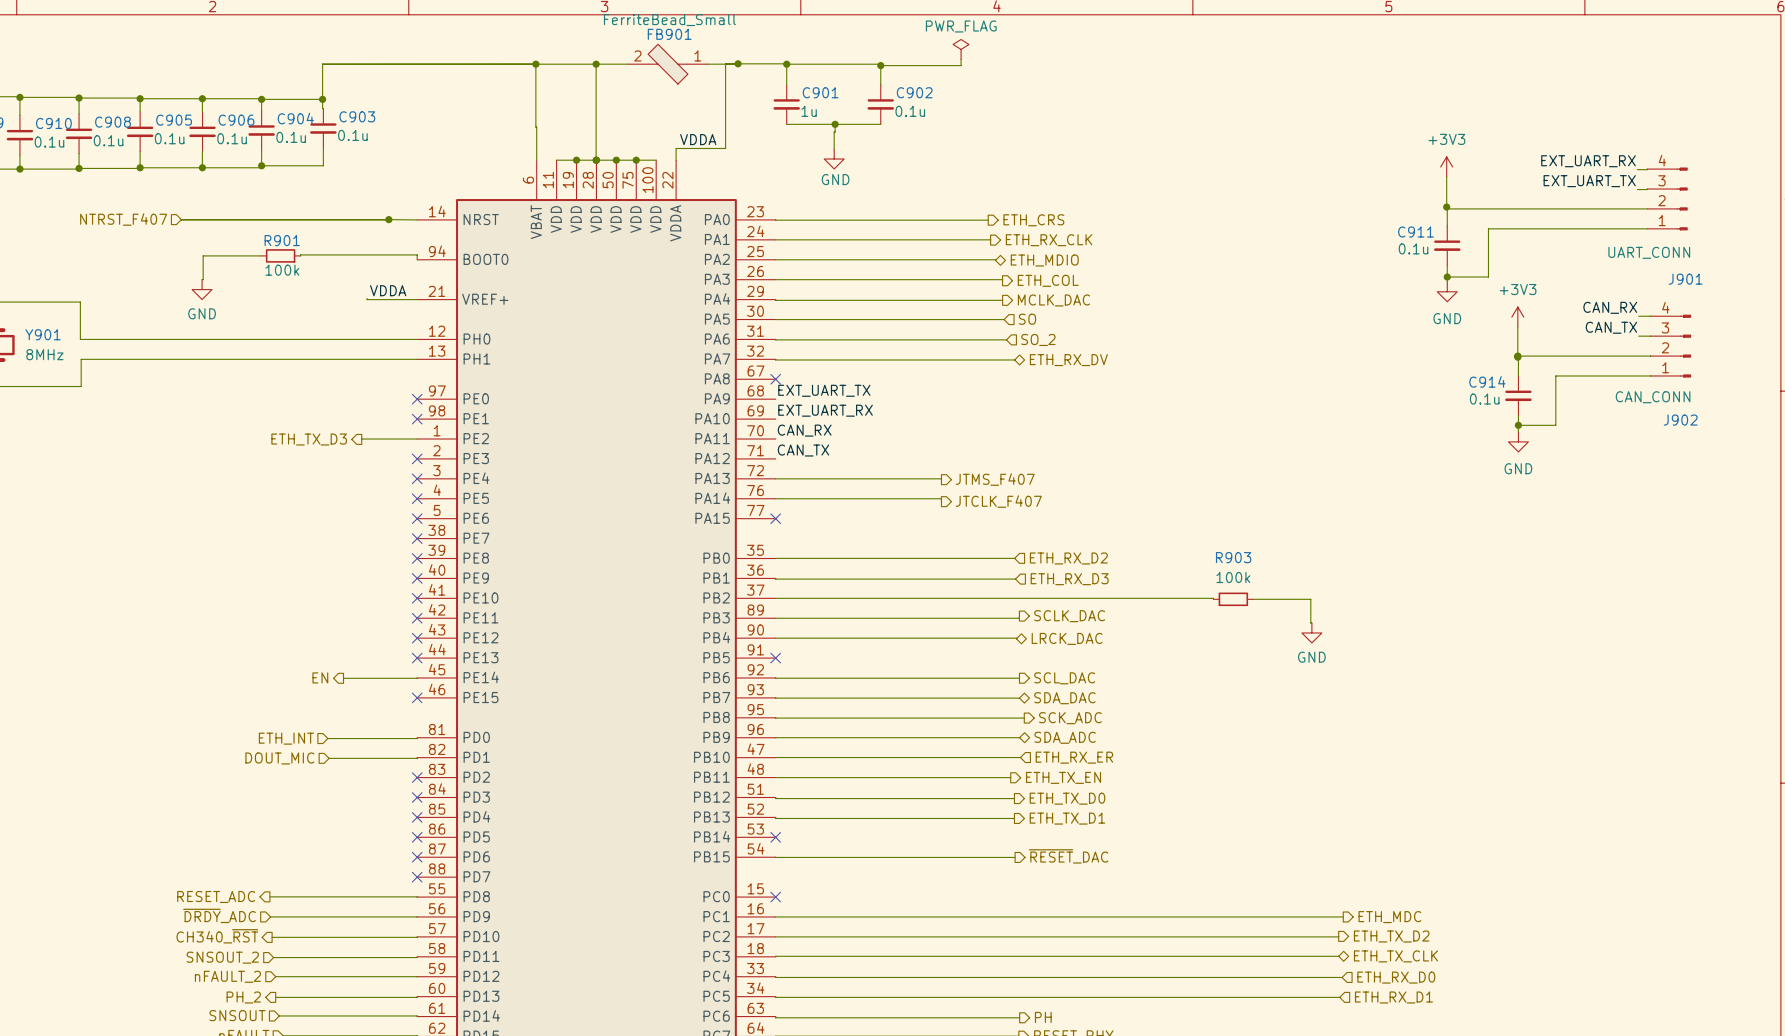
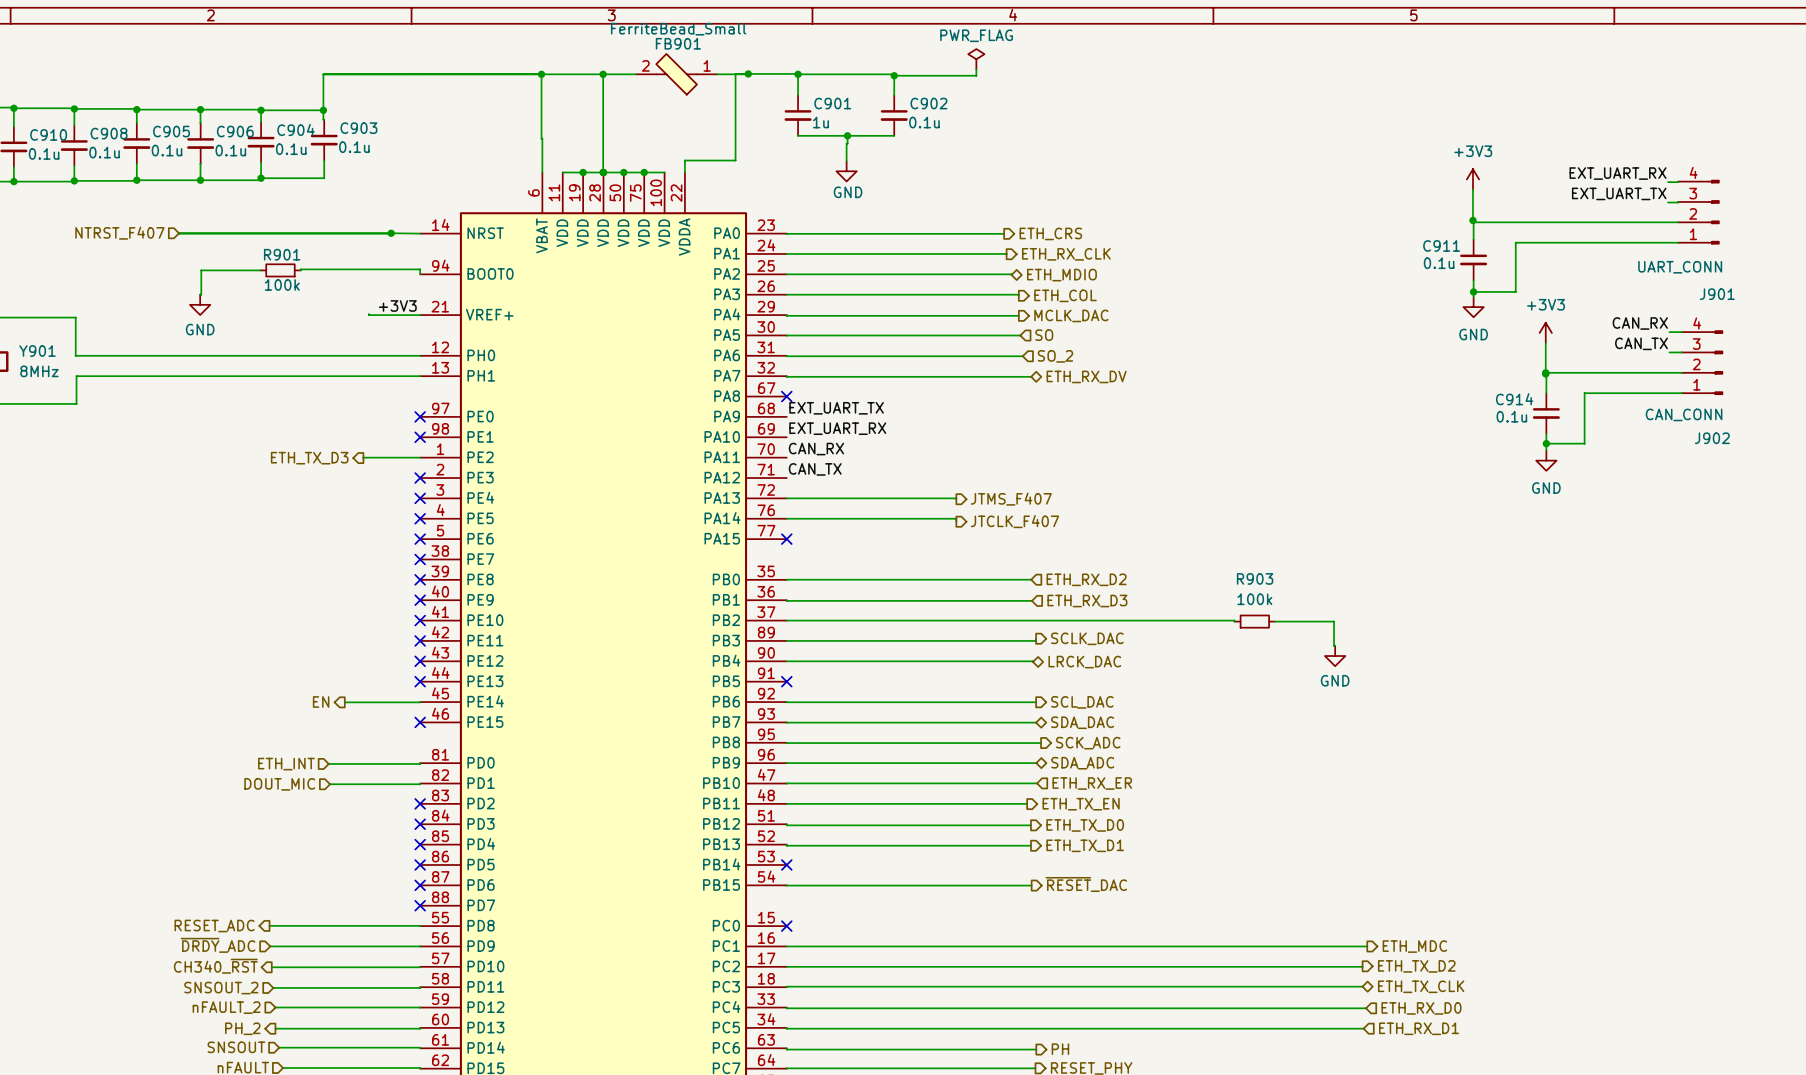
label: VDDA (698, 139) -> none
label: VDDA (388, 290) -> +3V3 (397, 305)

